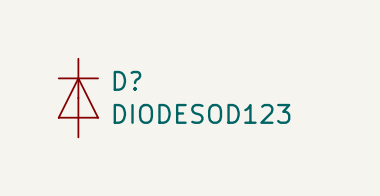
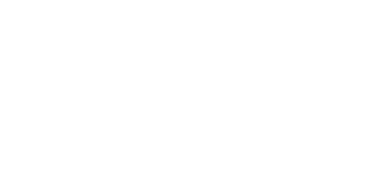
D?: DIODESOD123 (78, 98) -> none

